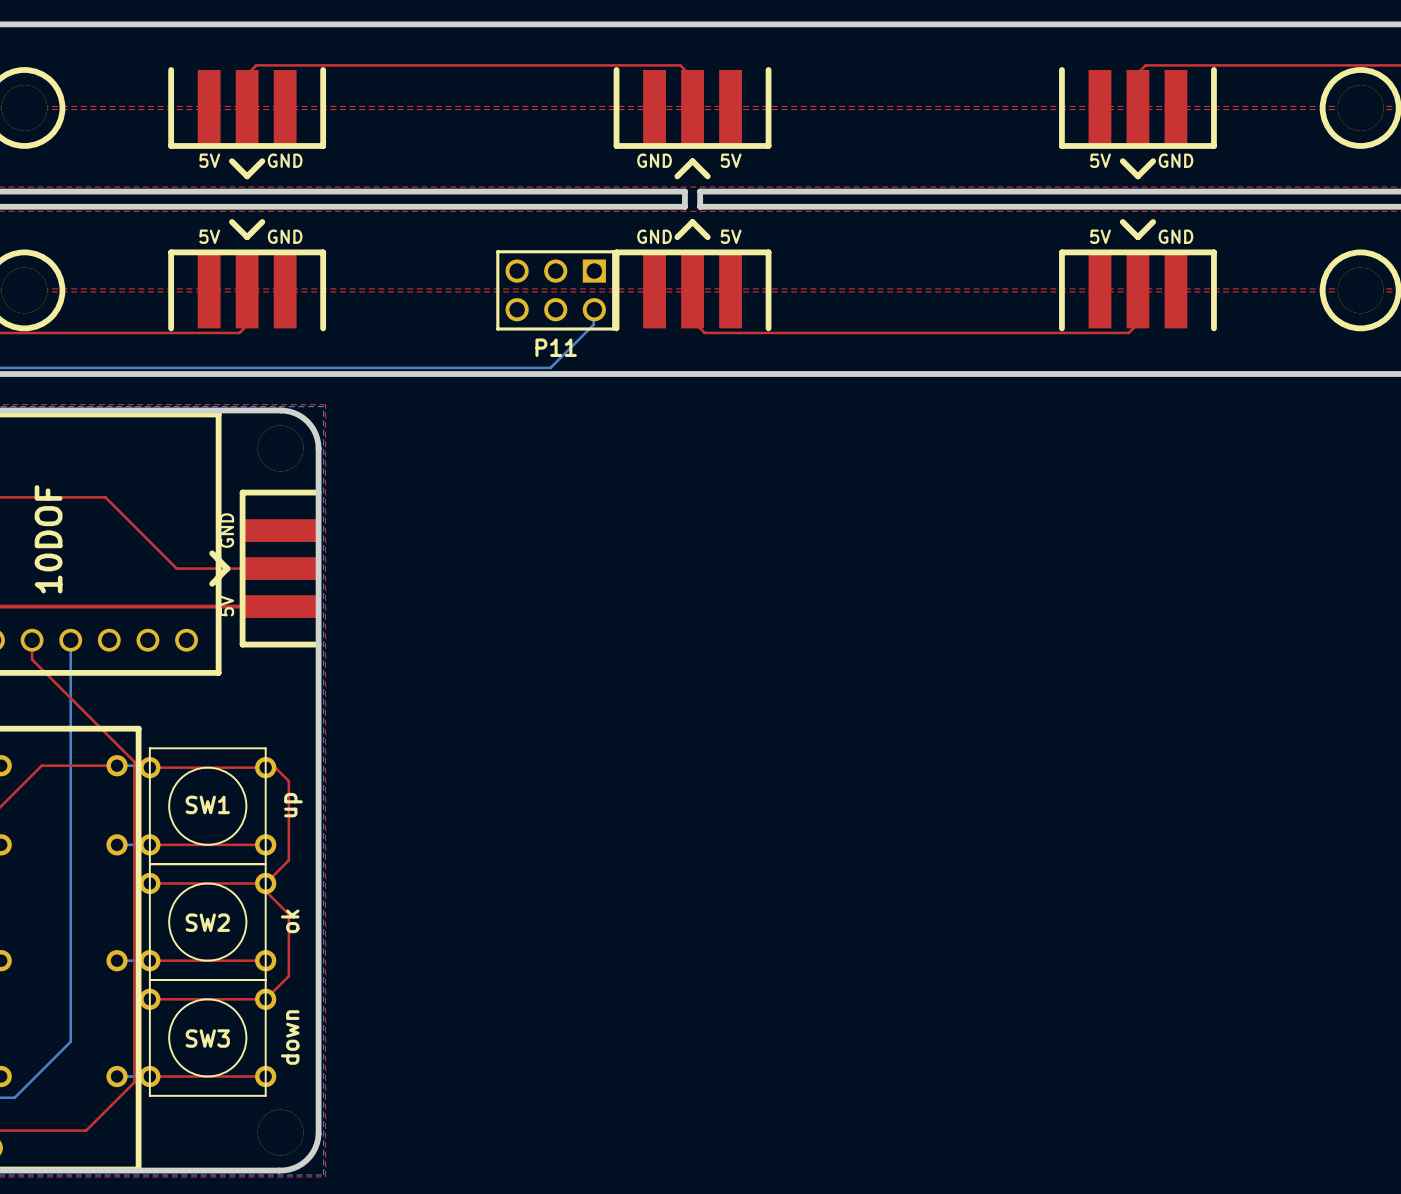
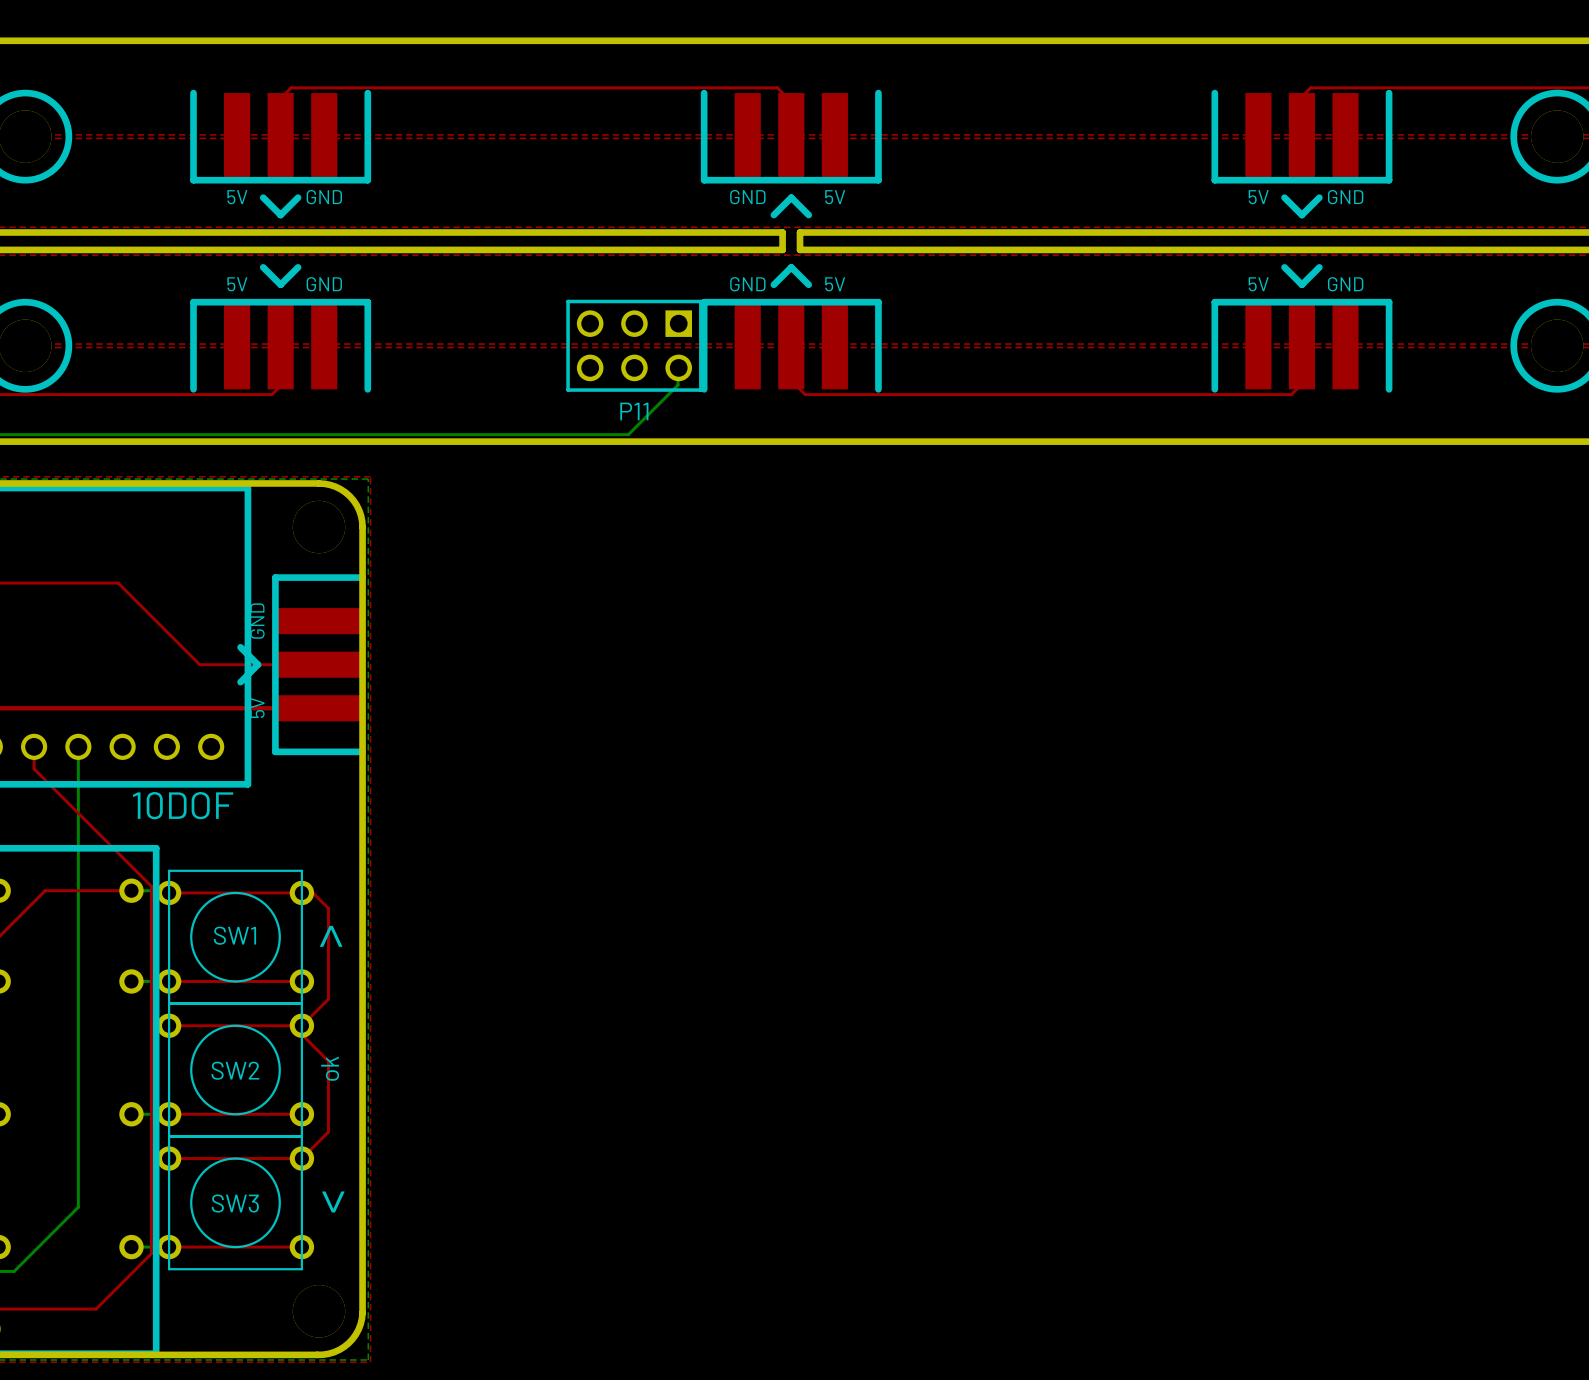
part value rotation: 0° (48, 539) -> 90° clockwise (183, 805)
part value position: 10DOF (48, 539) -> 10DOF (183, 805)
SW1 value: up (293, 805) -> > (331, 936)
SW3 value: down (290, 1037) -> < (333, 1201)

